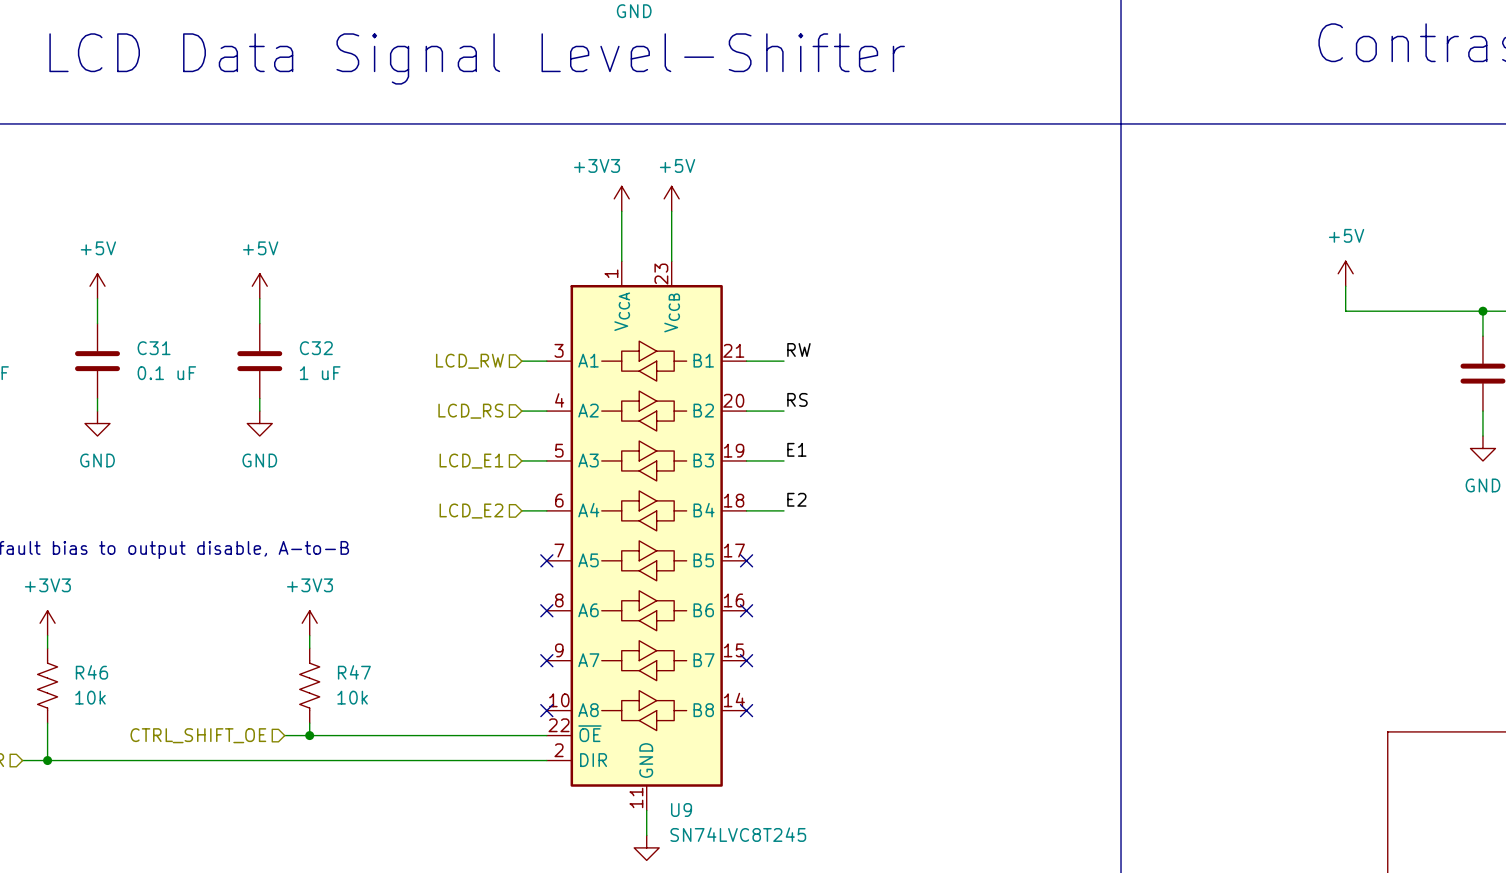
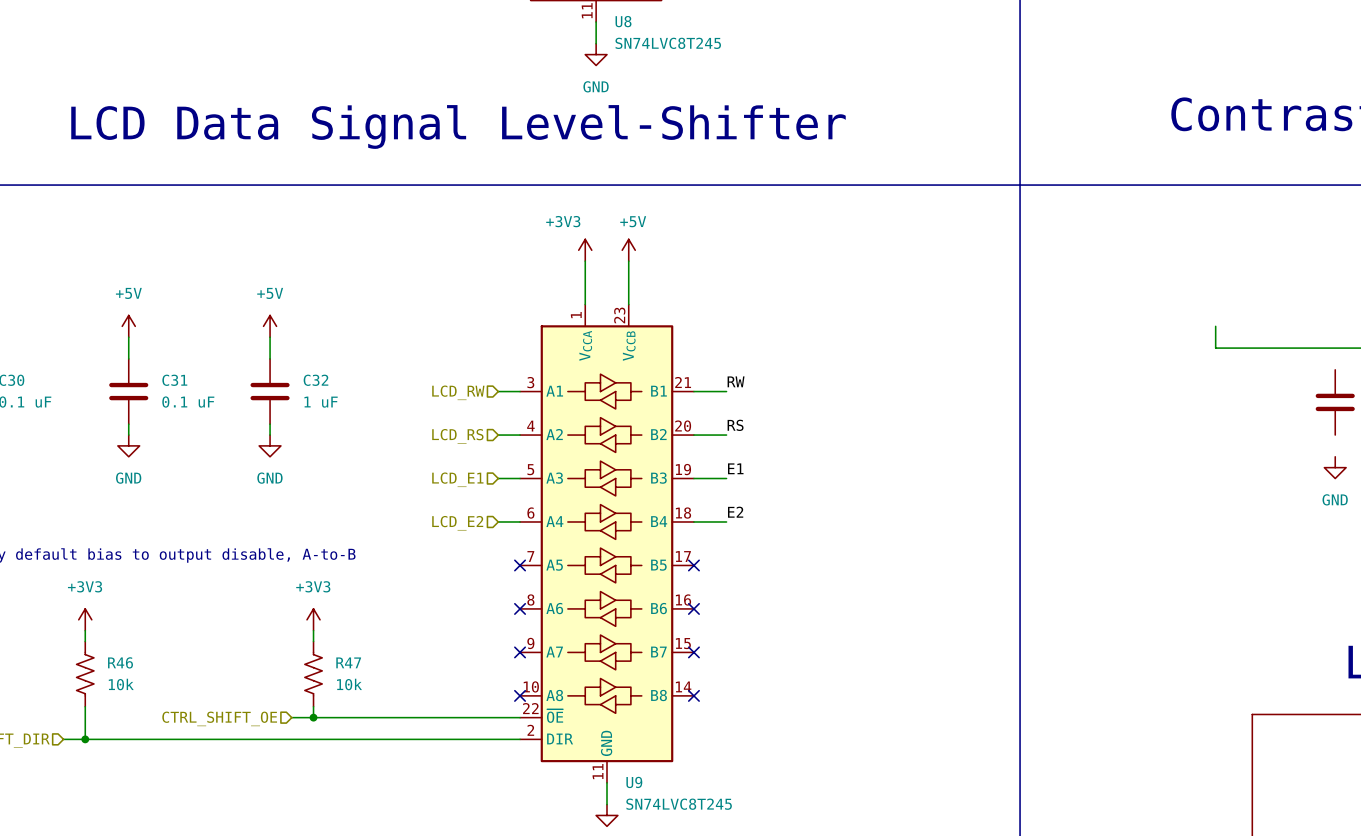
power symbol: +5V (1345, 273) -> none
wire: (1482, 311) (1482, 336) -> none
junction: (1482, 311) -> none
wire: (1482, 411) (1482, 436) -> none

